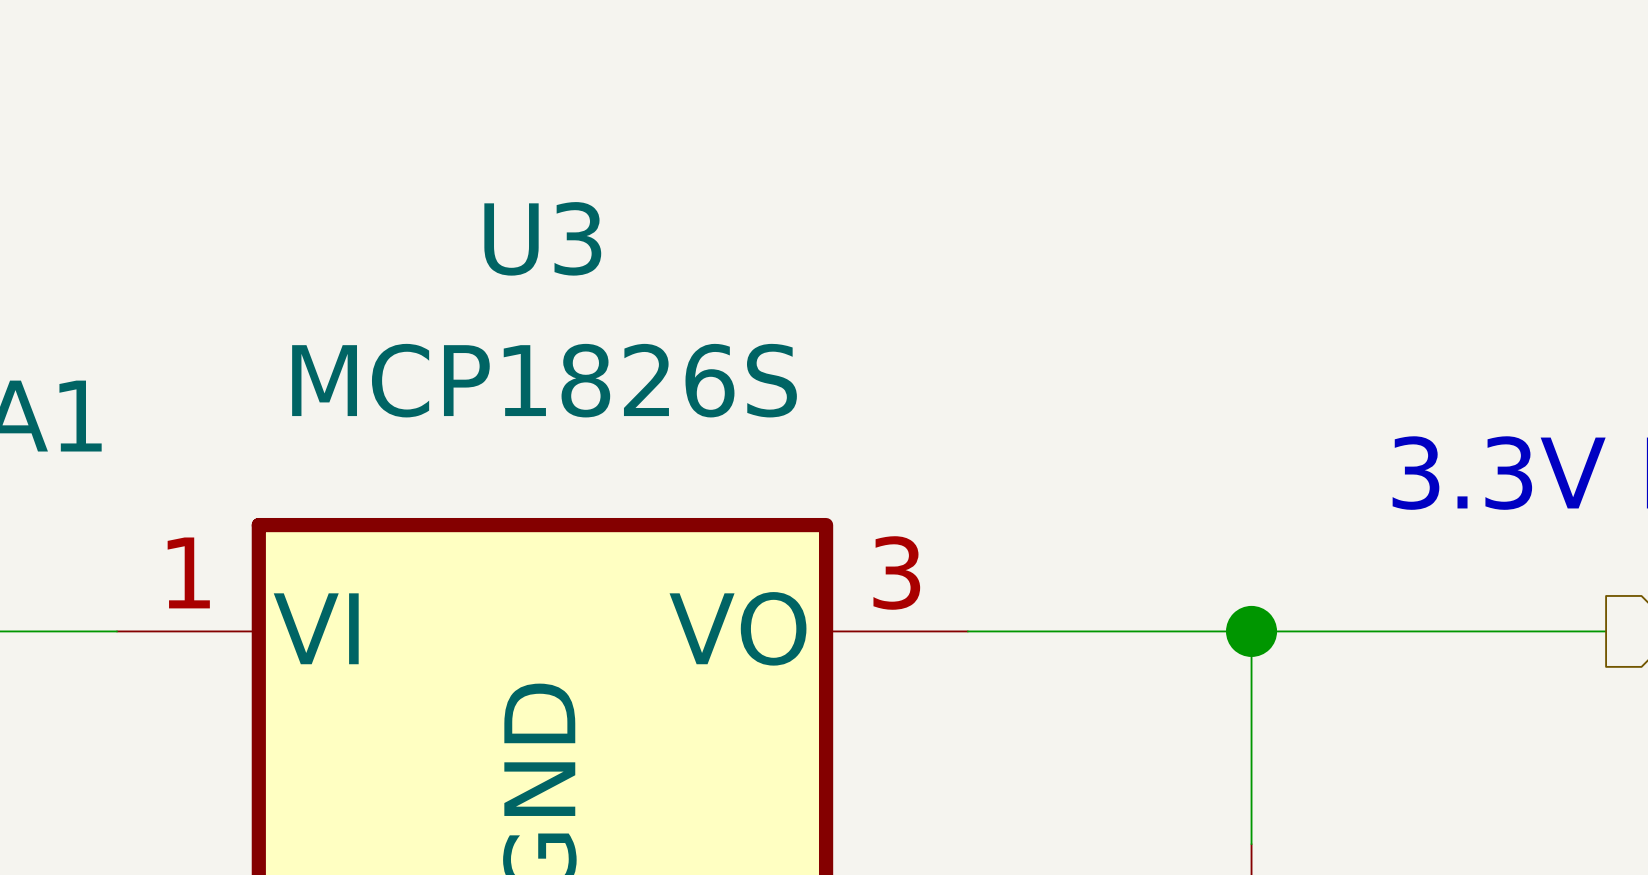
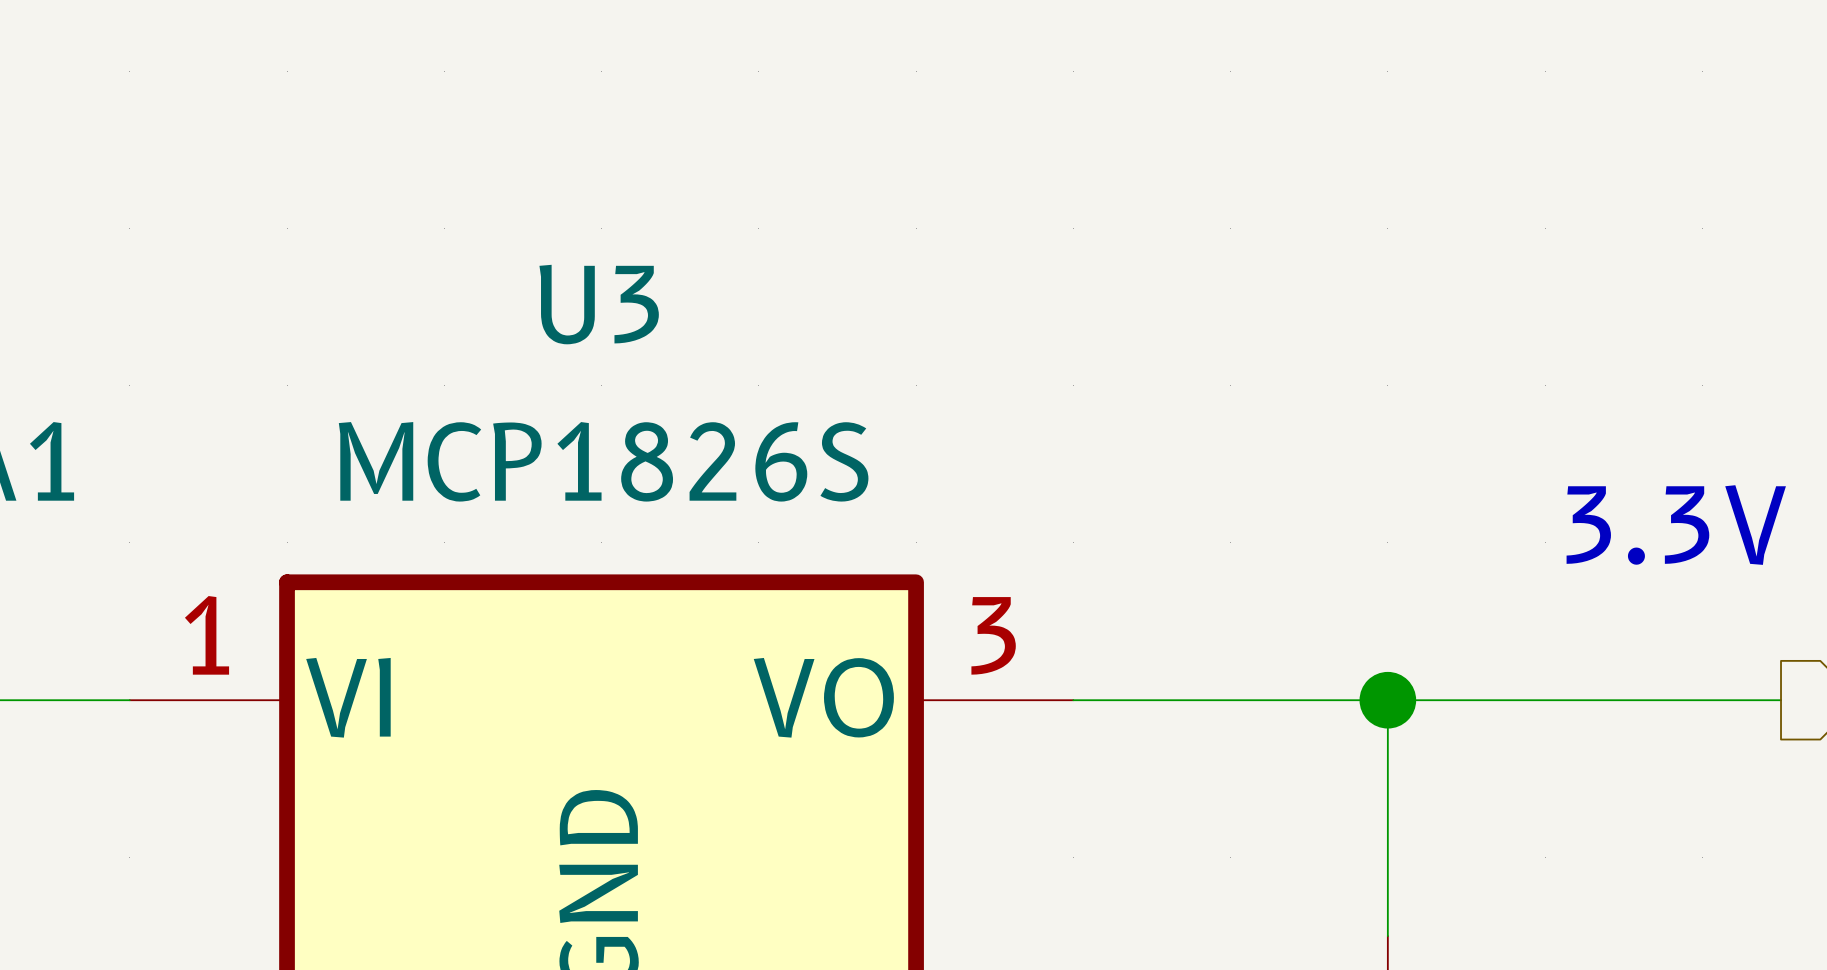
U3 name position: U3 (542, 238) -> U3 (599, 304)
U3 value position: MCP1826S (544, 380) -> MCP1826S (603, 461)

